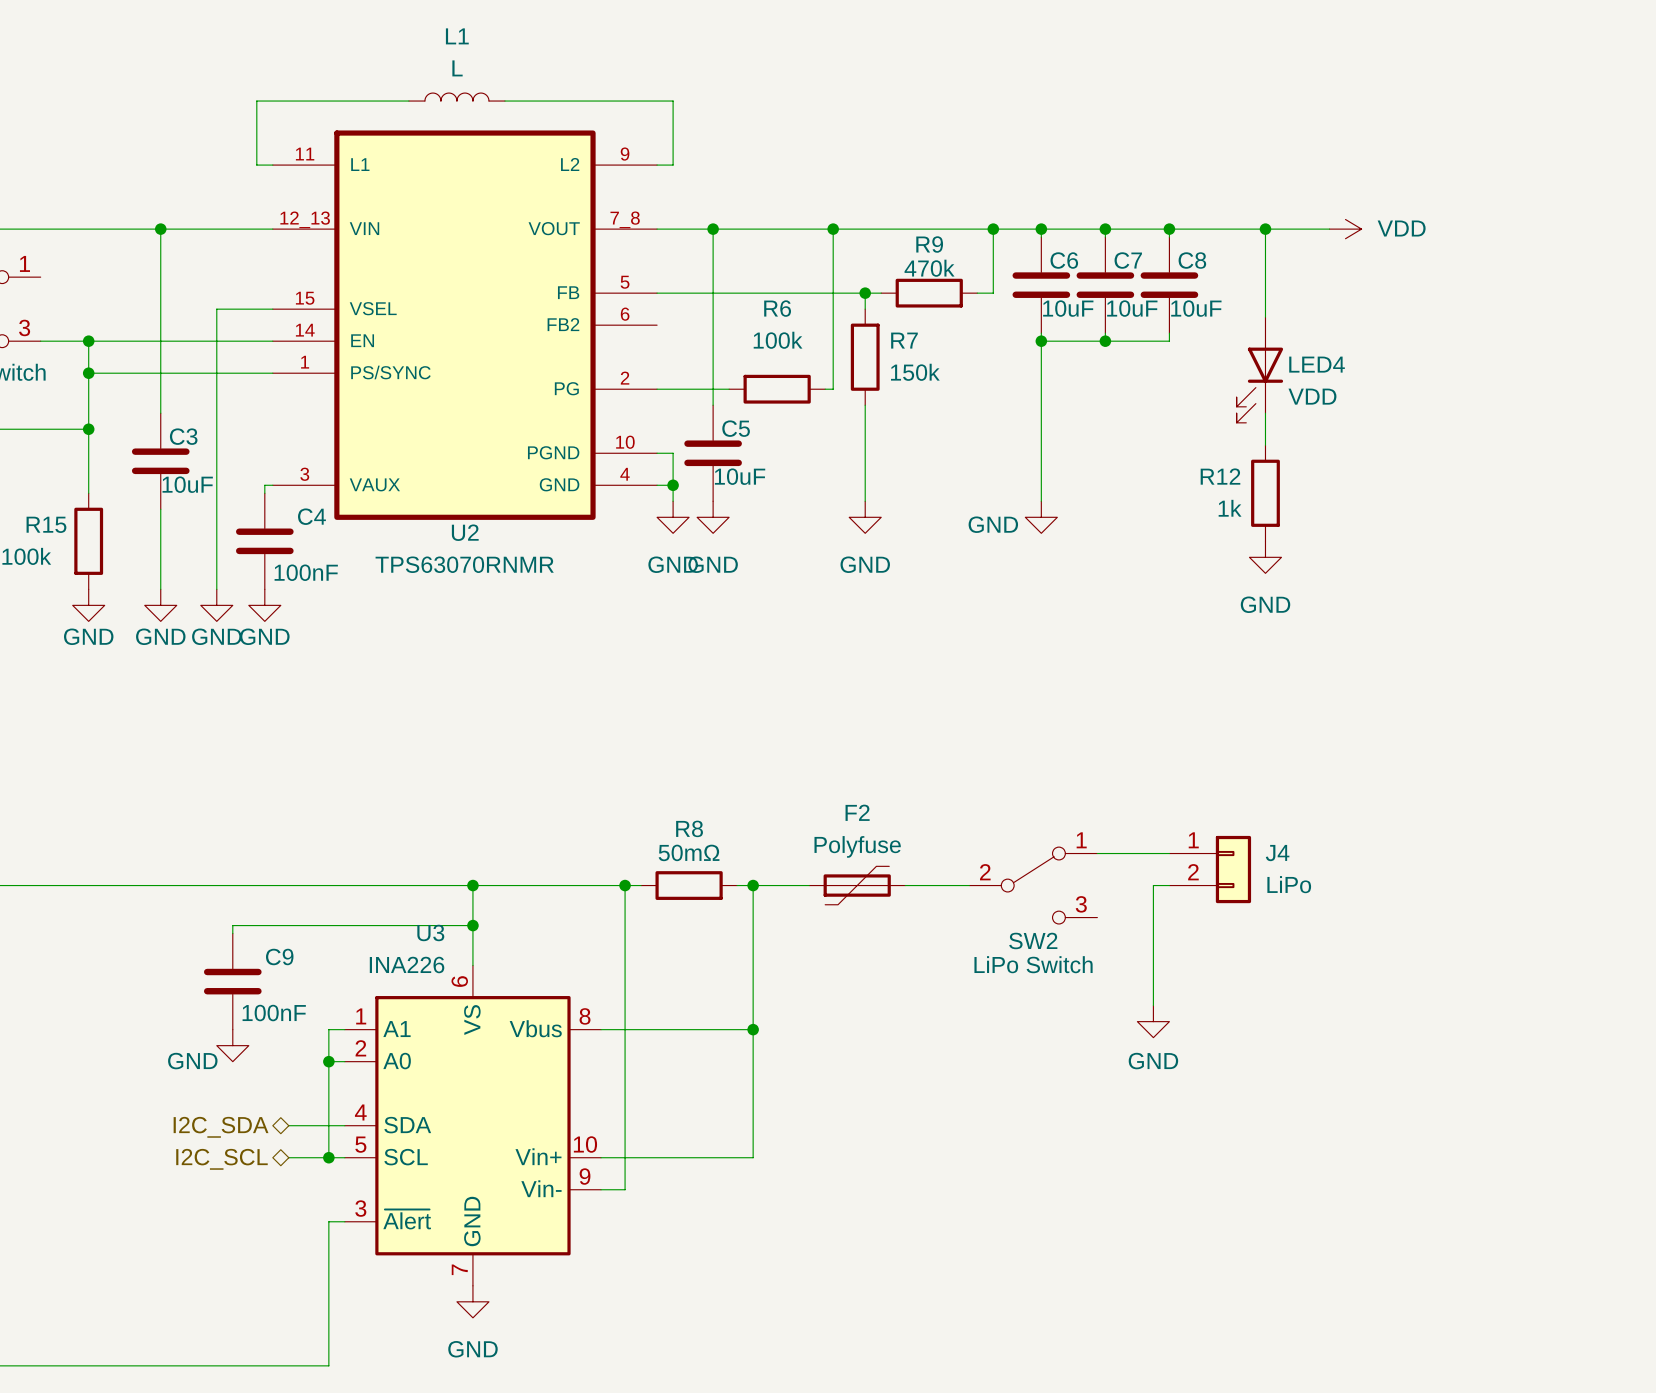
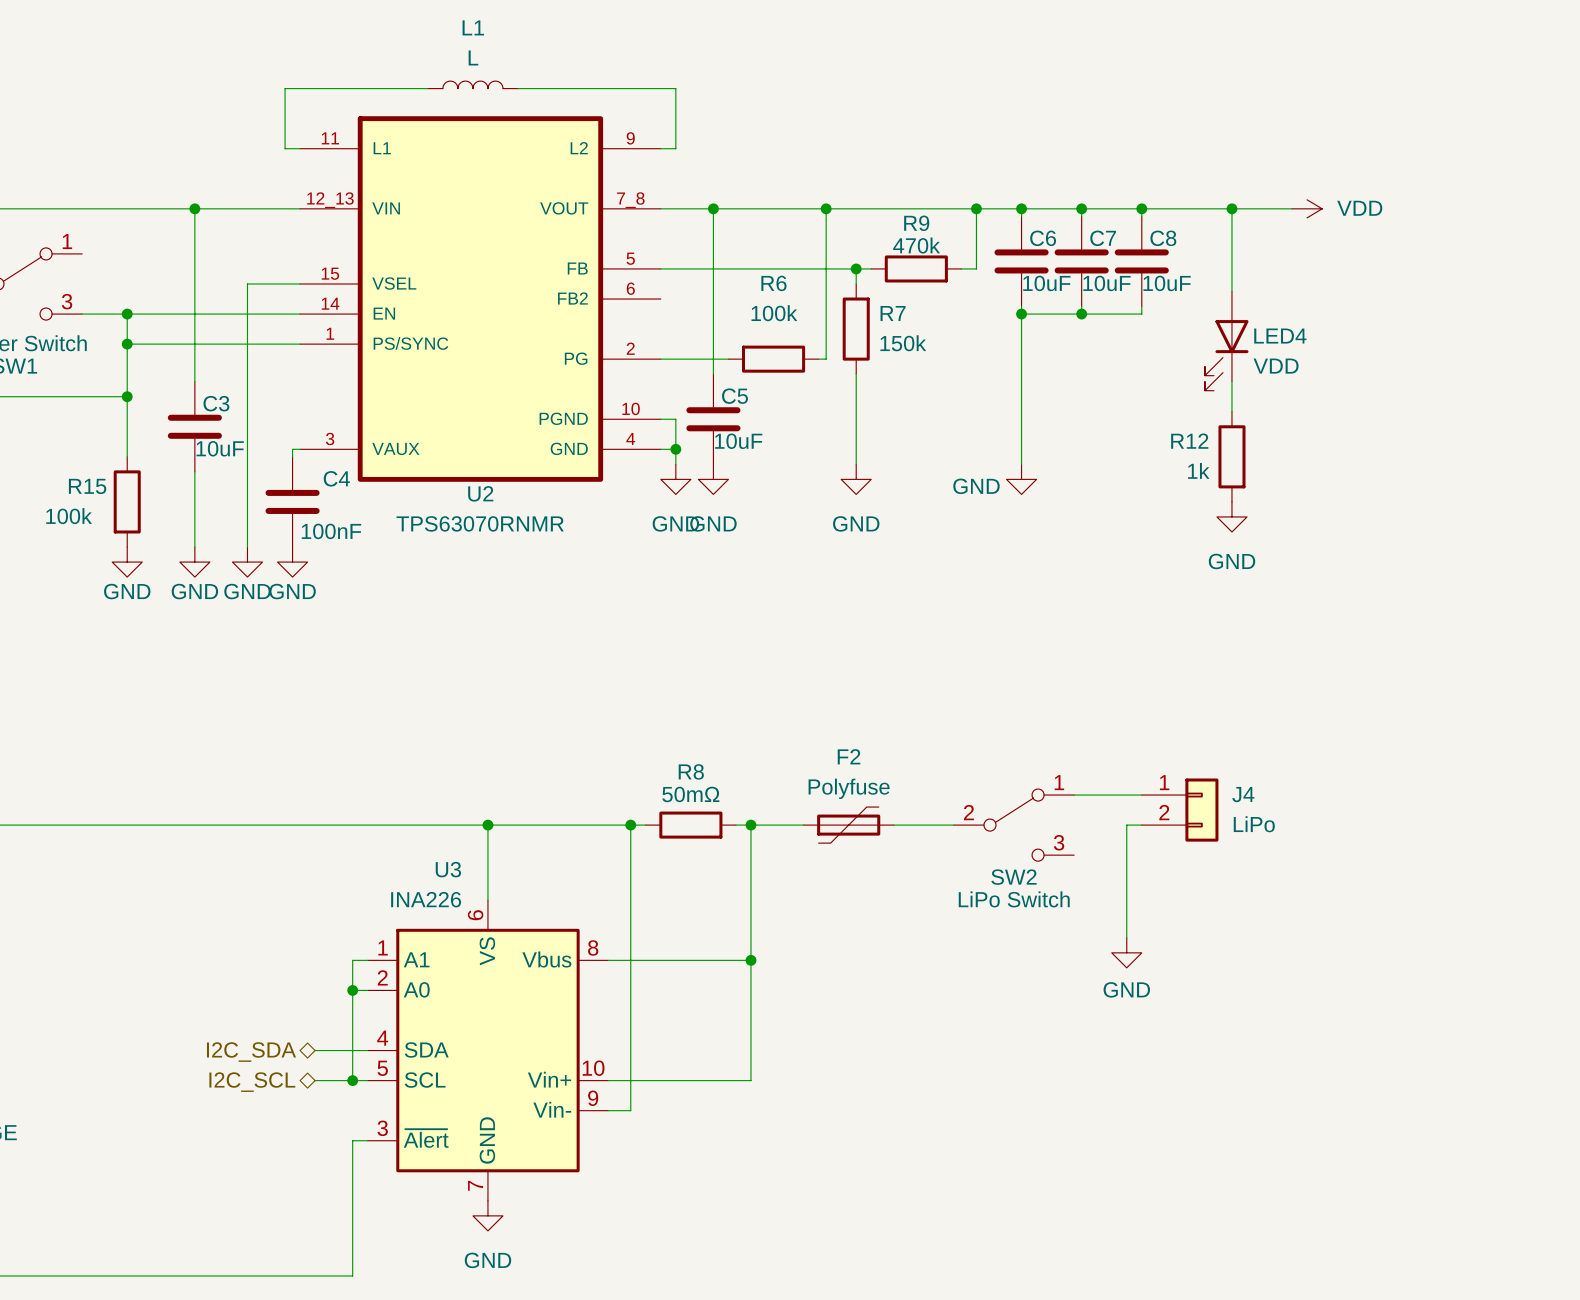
wire: (472, 925) (232, 925) (232, 933) -> none
junction: (472, 925) -> none
C9: 100nF (232, 981) -> none
power symbol: GND (232, 1045) -> none

